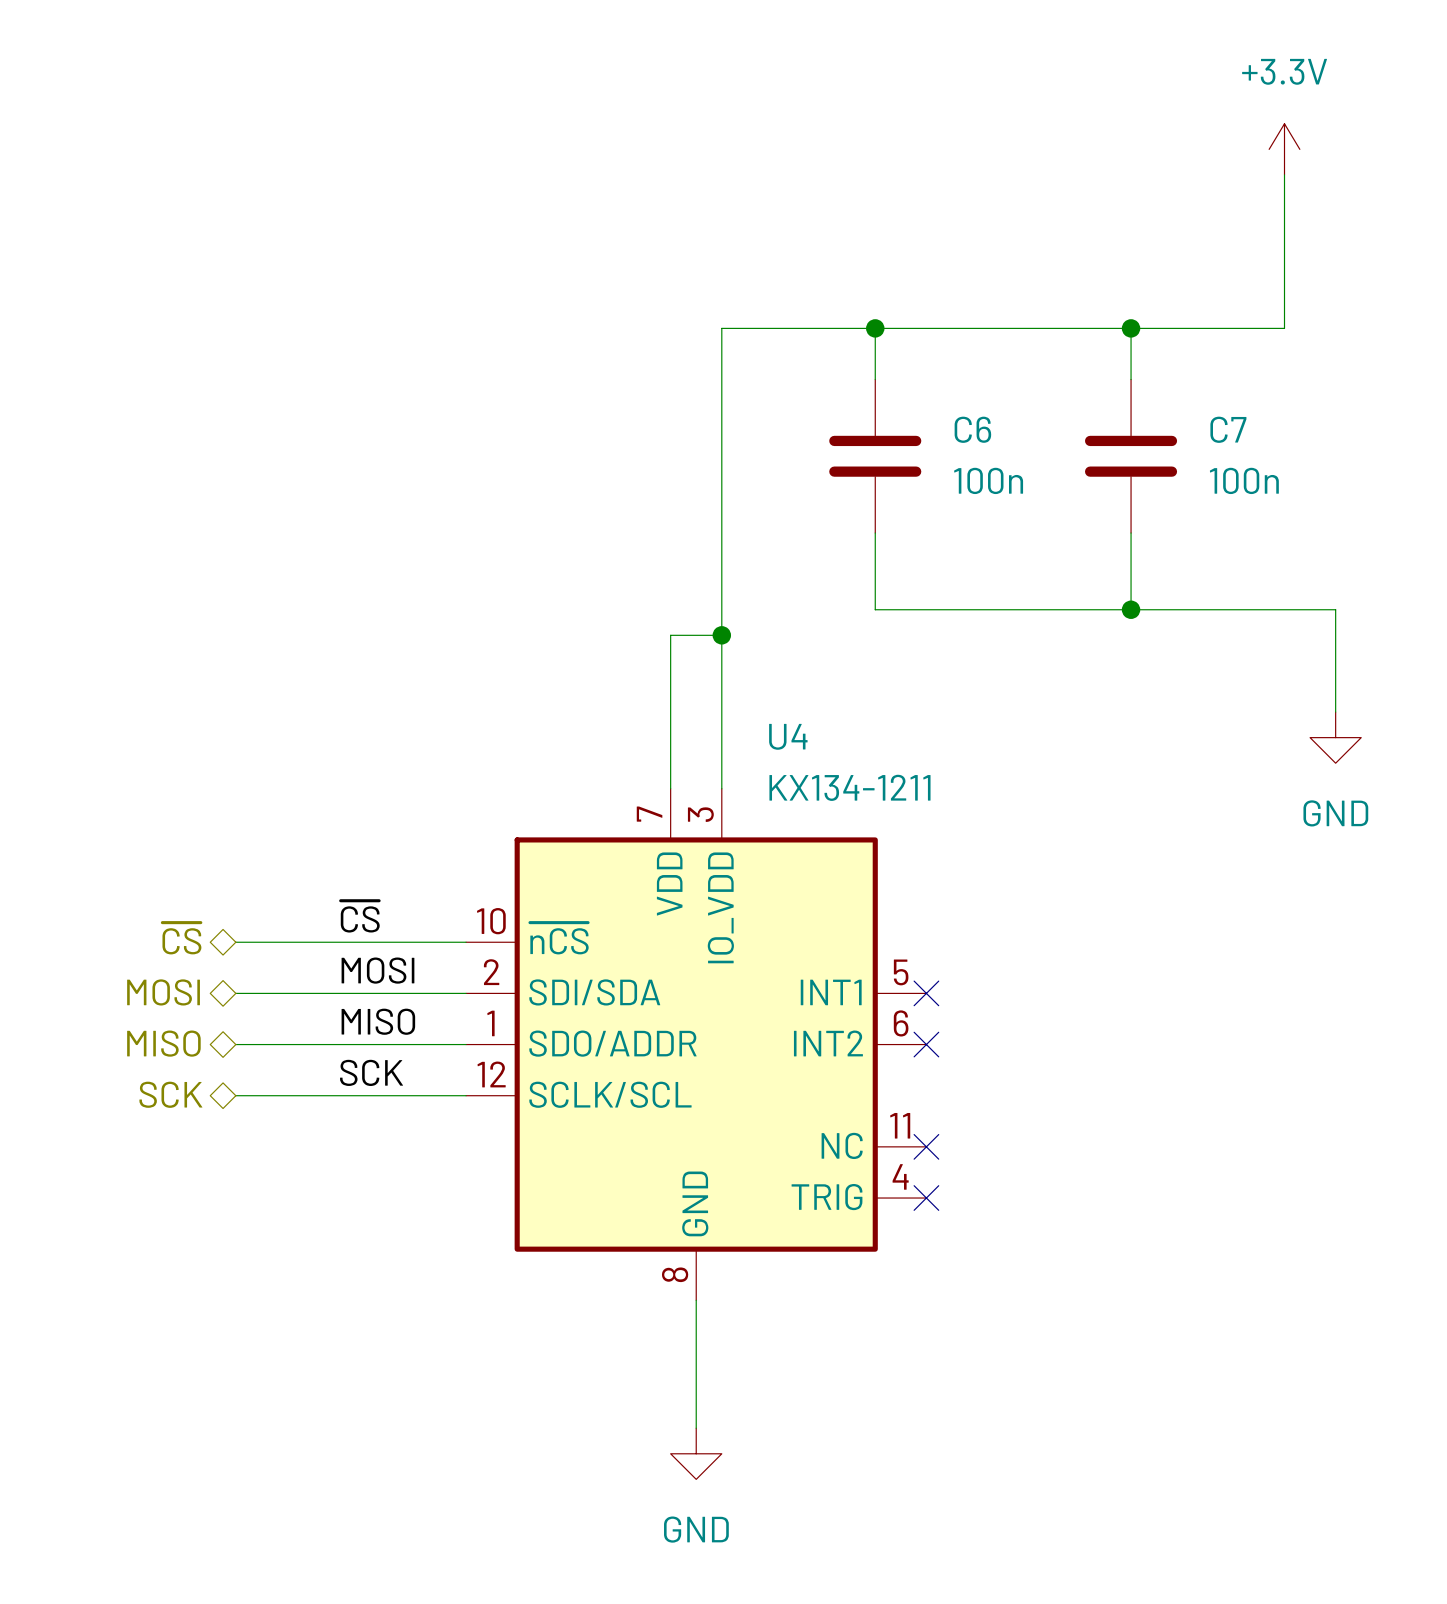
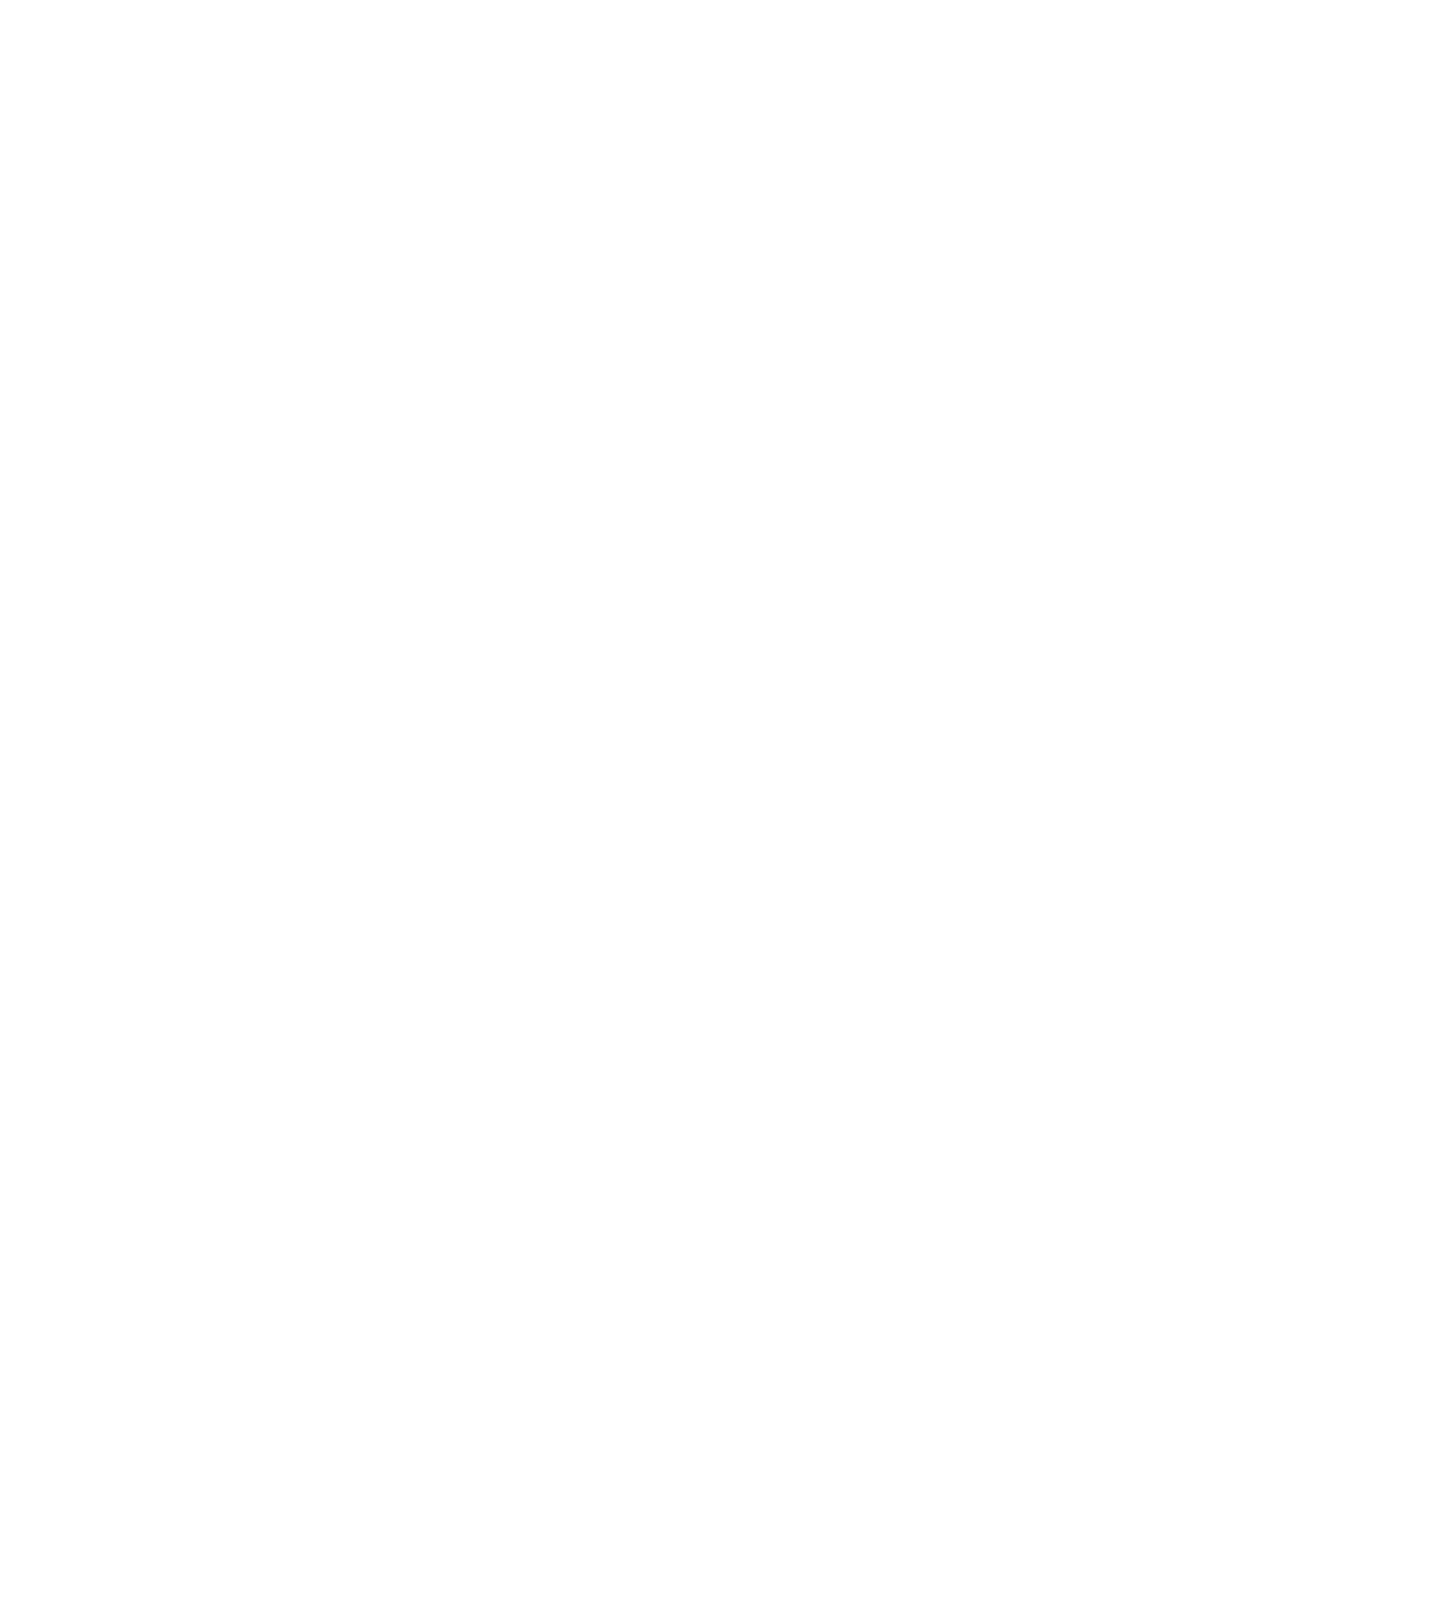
power symbol: +3.3V (1284, 149) -> none
wire: (1284, 174) (1284, 328) (721, 328) (721, 788) -> none
wire: (875, 328) (875, 379) -> none
junction: (875, 328) -> none
wire: (1131, 328) (1131, 379) -> none
junction: (1131, 328) -> none
C6: 100n (875, 456) -> none
C7: 100n (1131, 456) -> none
wire: (875, 533) (875, 609) (1335, 609) (1335, 712) -> none
wire: (1131, 533) (1131, 609) -> none
junction: (1131, 609) -> none
wire: (721, 635) (670, 635) (670, 788) -> none
junction: (721, 635) -> none
power symbol: GND (1335, 737) -> none
label: ~{CS} (360, 916) -> none
hierarchical label: ~{CS} (181, 938) -> none
wire: (235, 942) (466, 942) -> none
label: MOSI (377, 970) -> none
hierarchical label: MOSI (163, 992) -> none
wire: (235, 993) (466, 993) -> none
no-connect mark: (926, 993) -> none
label: MISO (378, 1021) -> none
hierarchical label: MISO (163, 1043) -> none
wire: (235, 1044) (466, 1044) -> none
U4: KX134-1211 (696, 1044) -> none
no-connect mark: (926, 1044) -> none
label: SCK (371, 1072) -> none
hierarchical label: SCK (170, 1094) -> none
wire: (235, 1095) (466, 1095) -> none
no-connect mark: (926, 1146) -> none
no-connect mark: (926, 1198) -> none
wire: (696, 1300) (696, 1428) -> none
power symbol: GND (696, 1453) -> none

